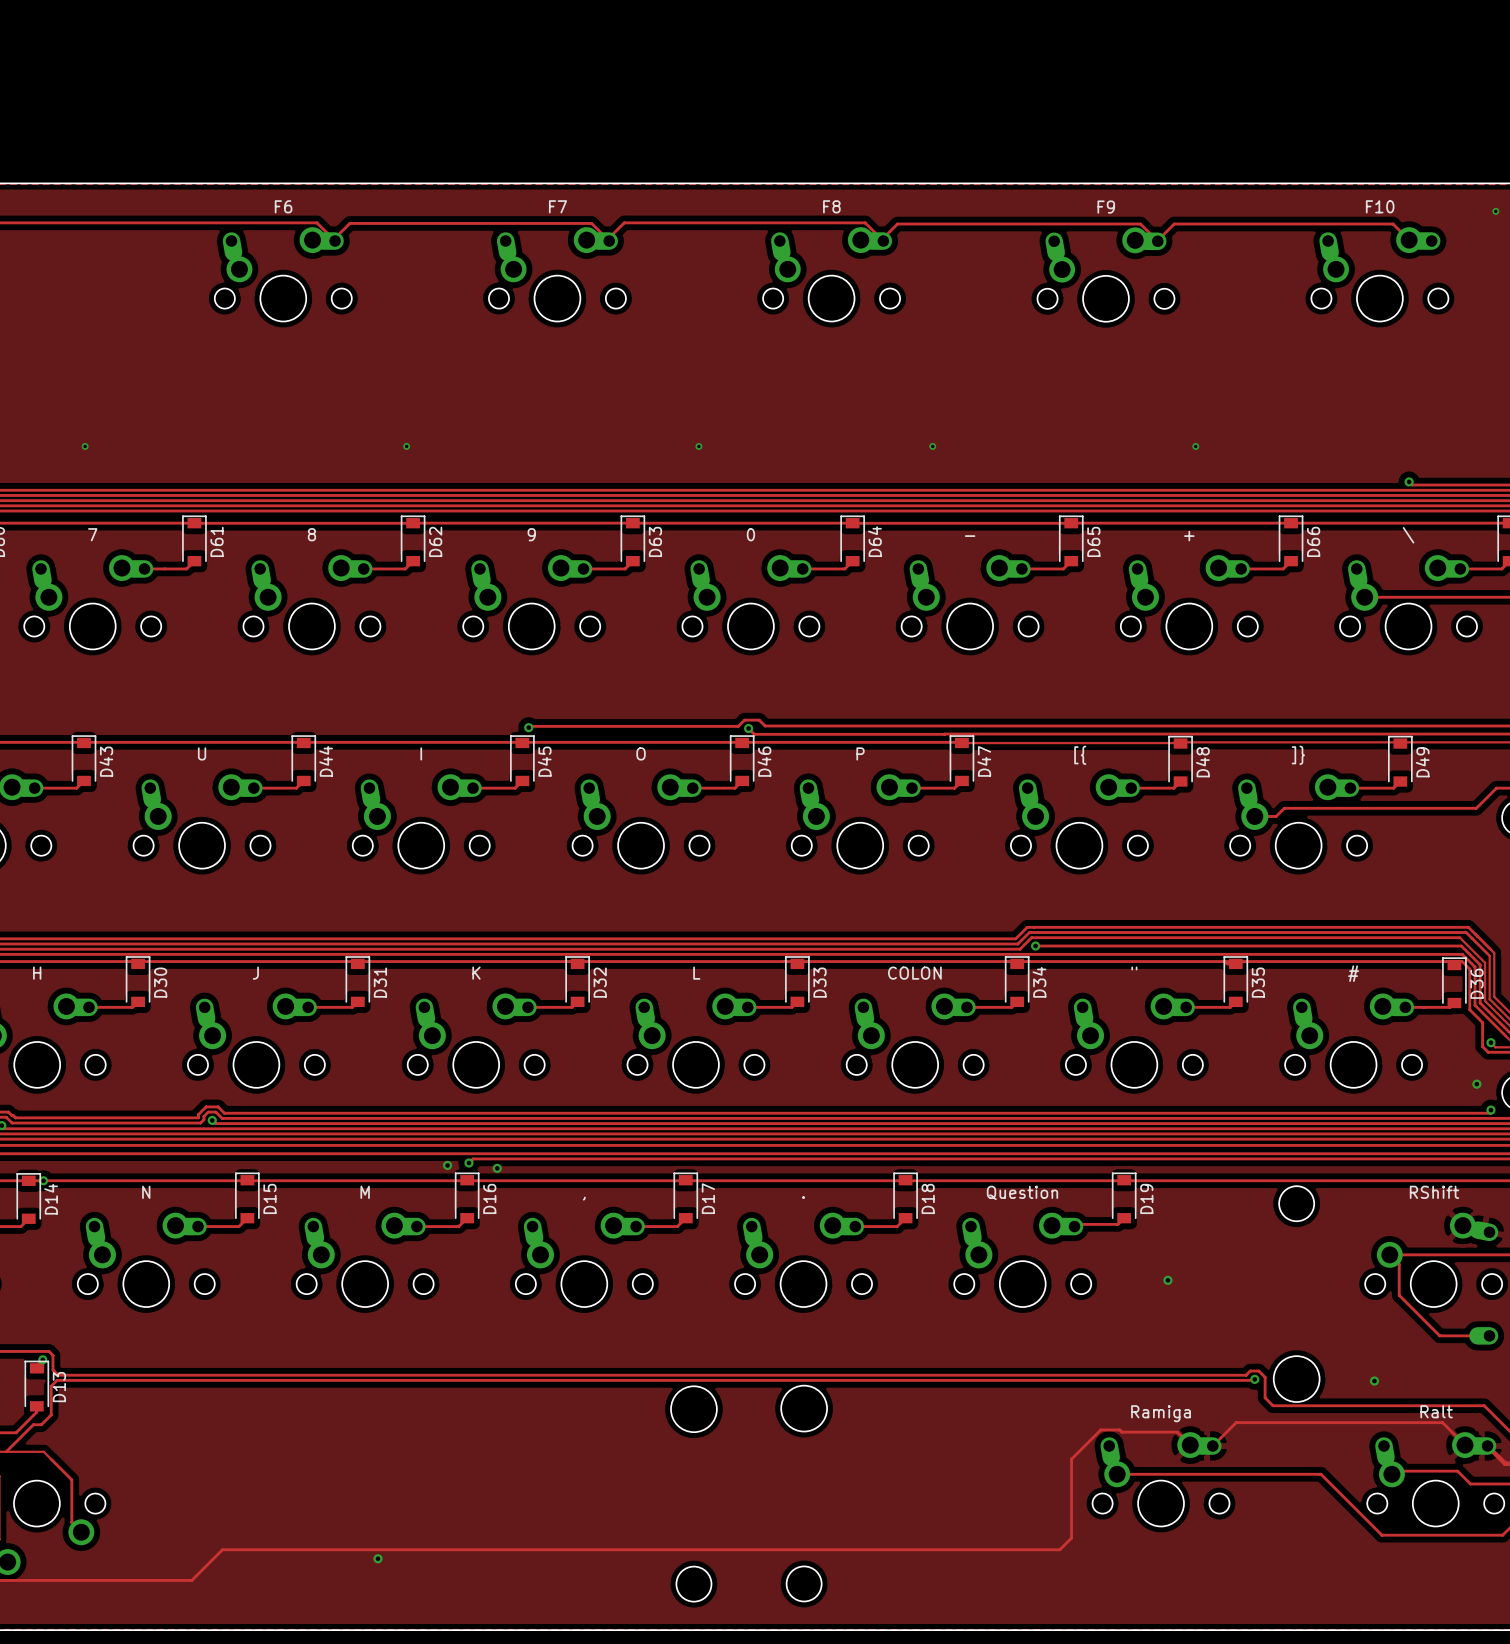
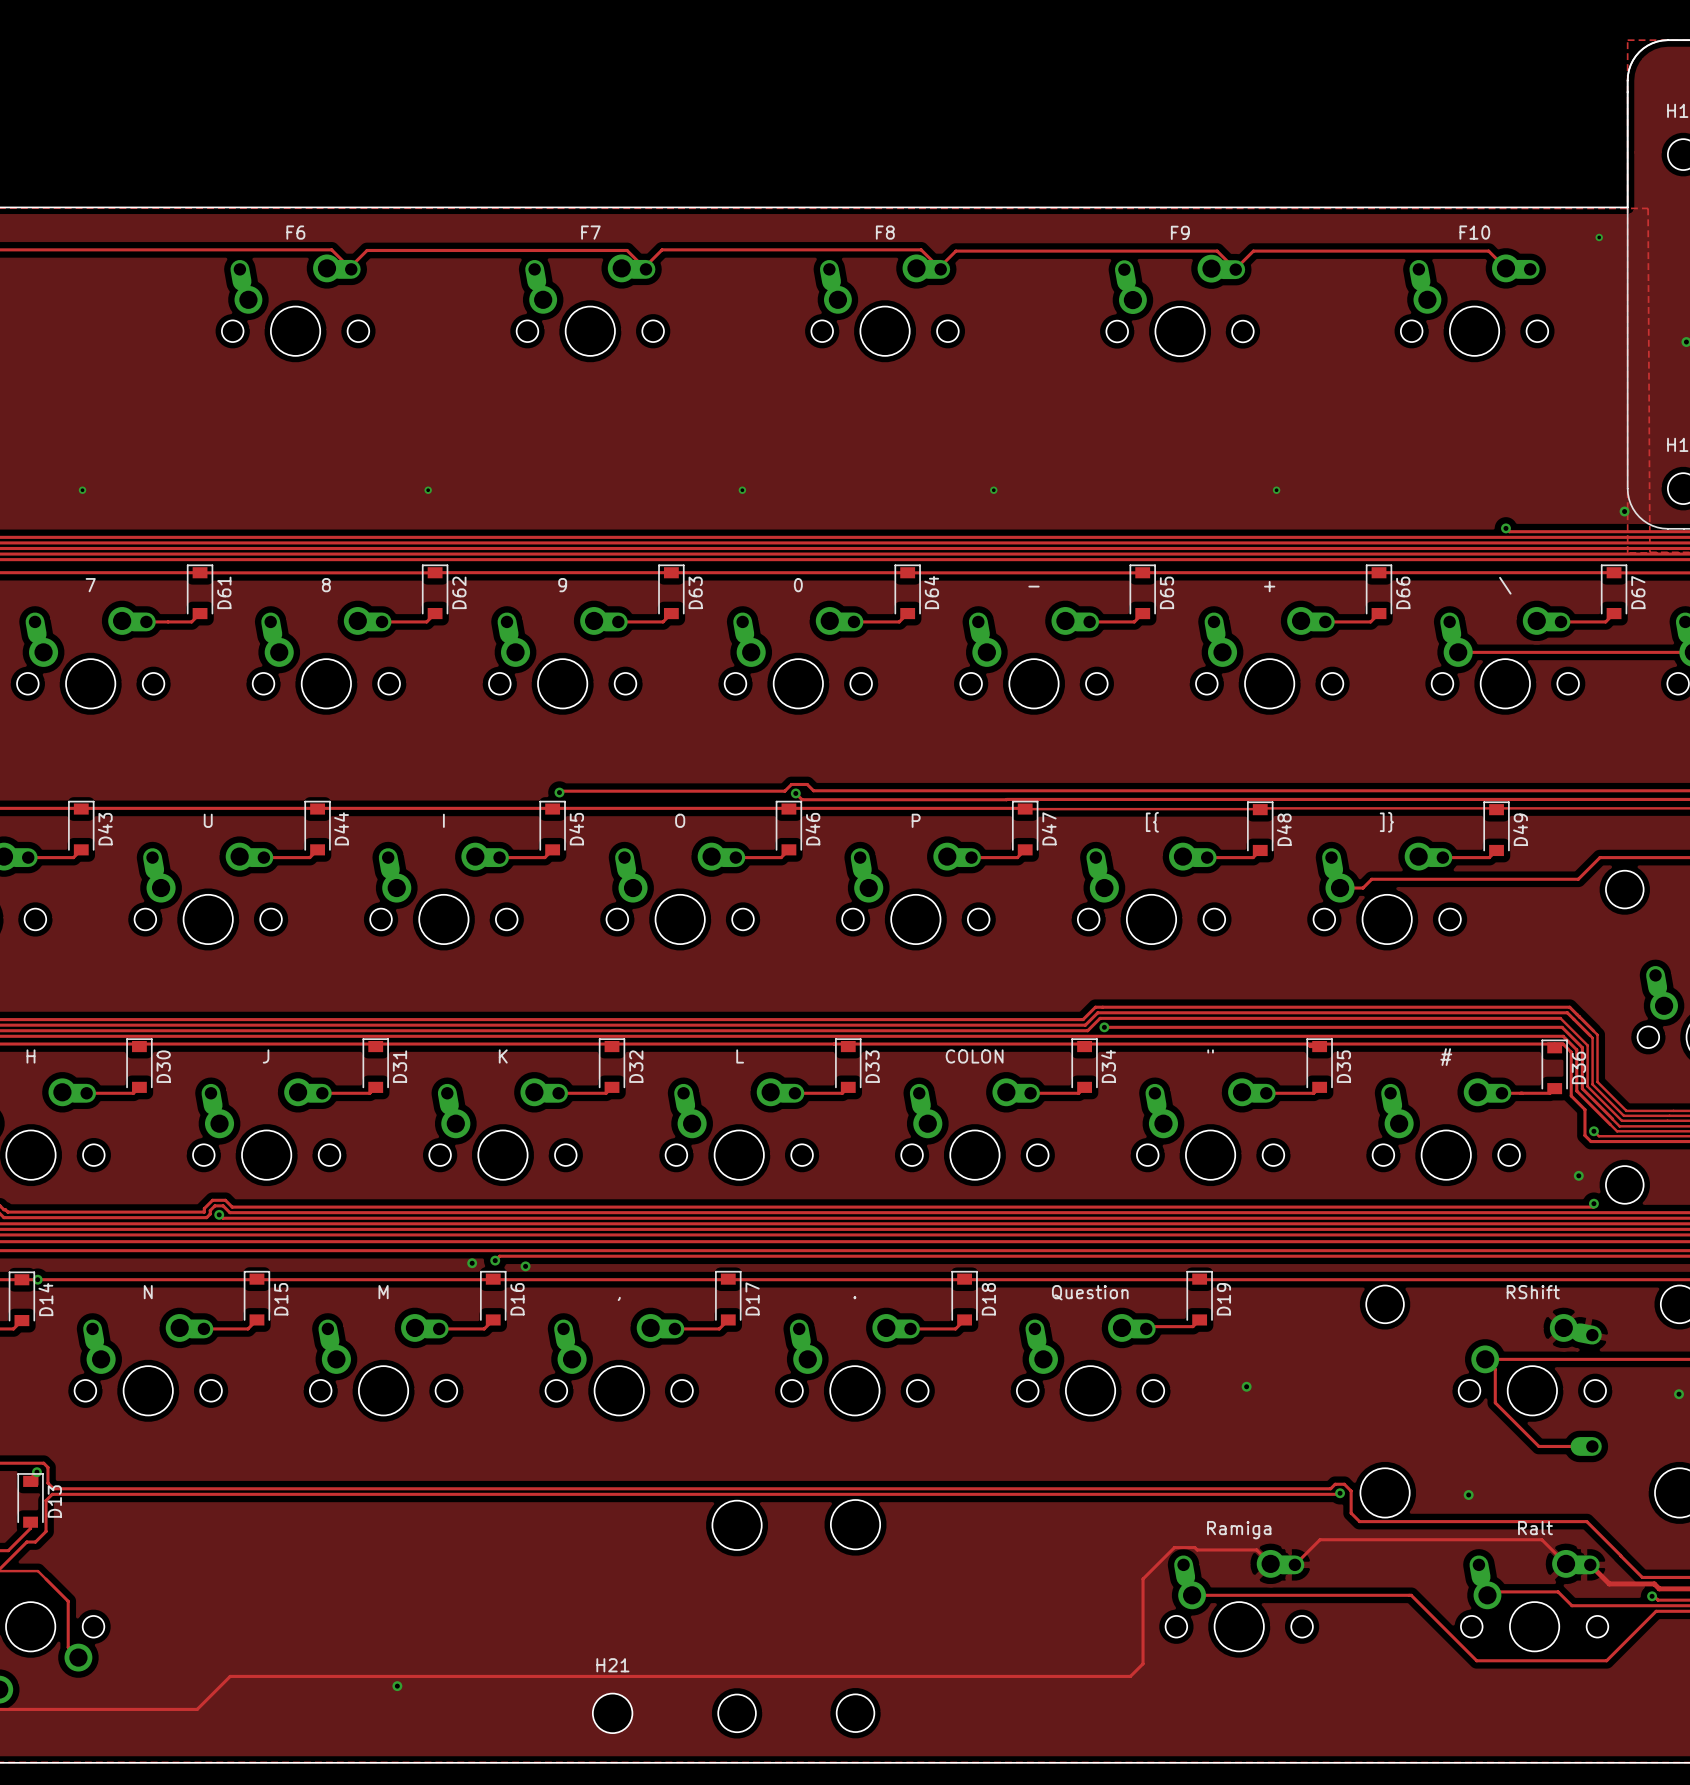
H21: none -> (612, 1713)

